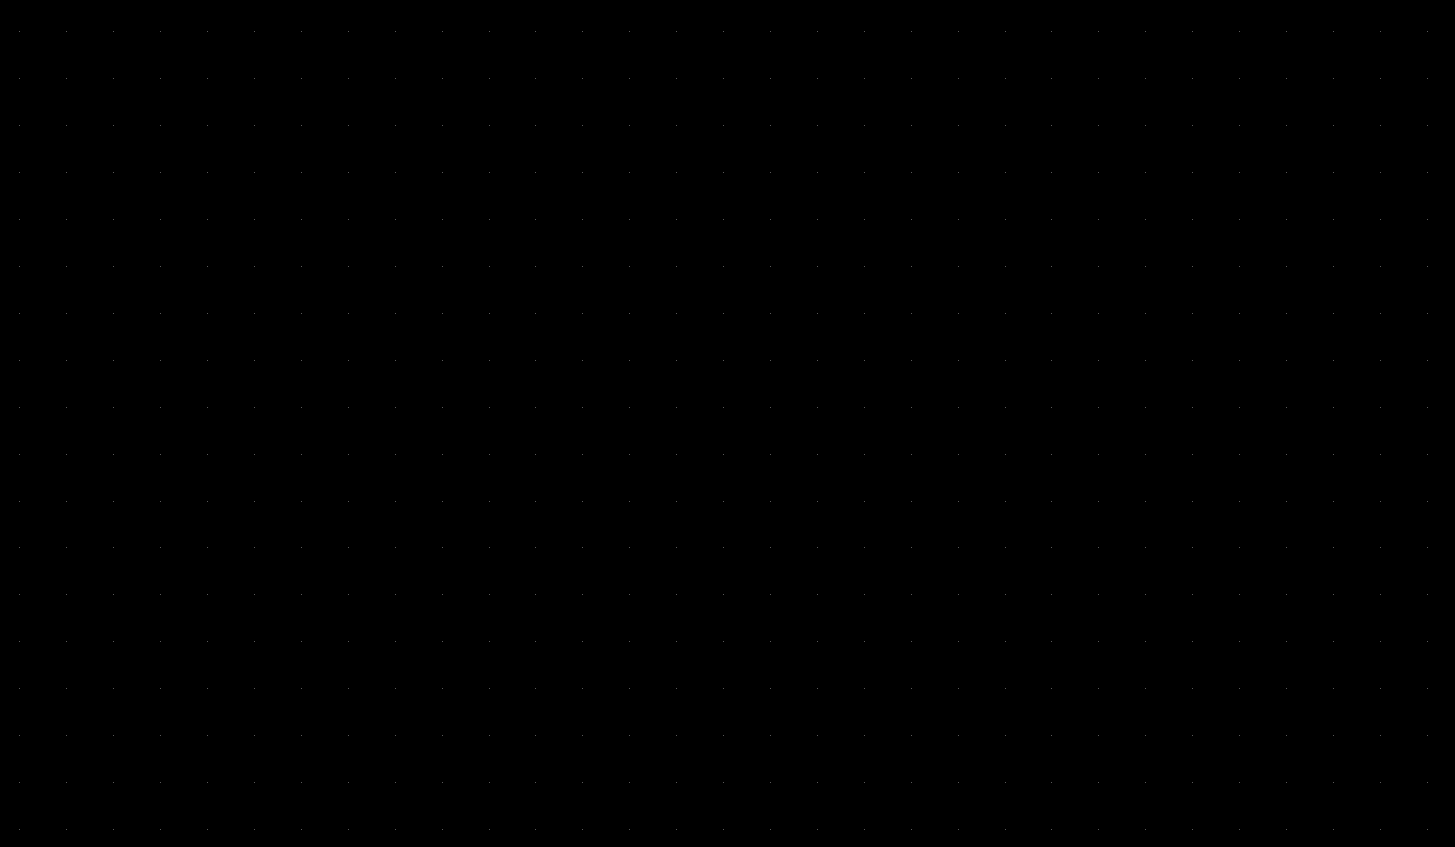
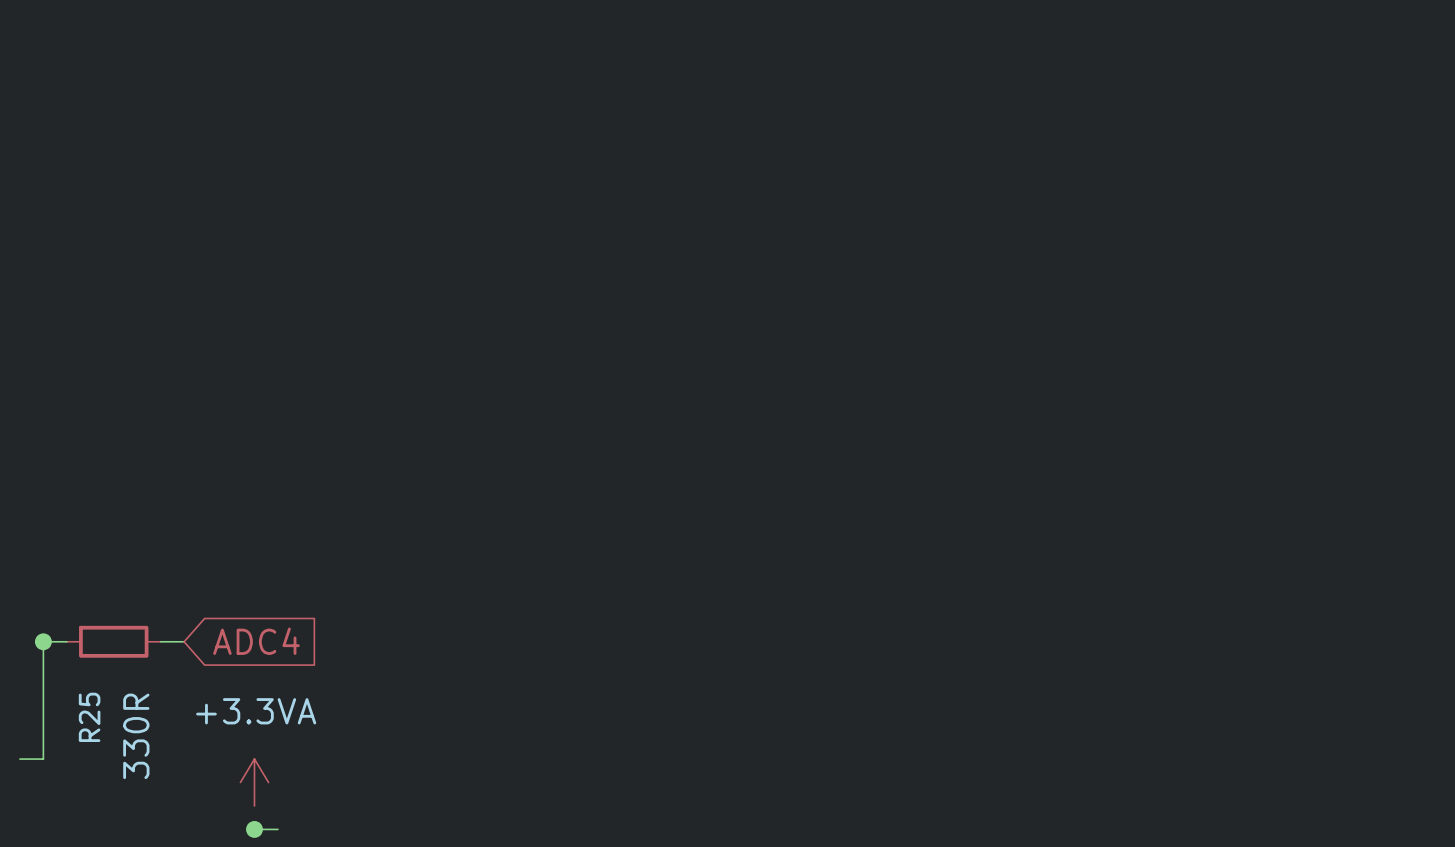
junction: none -> (43, 641)
wire: none -> (66, 641) (43, 641) (43, 759) (19, 759)
R25: none -> 330R (113, 641)
wire: none -> (160, 641) (184, 641)
global label: none -> ADC4 (256, 641)
power symbol: none -> +3.3VA (254, 782)
wire: none -> (254, 829) (277, 829)
junction: none -> (254, 829)

